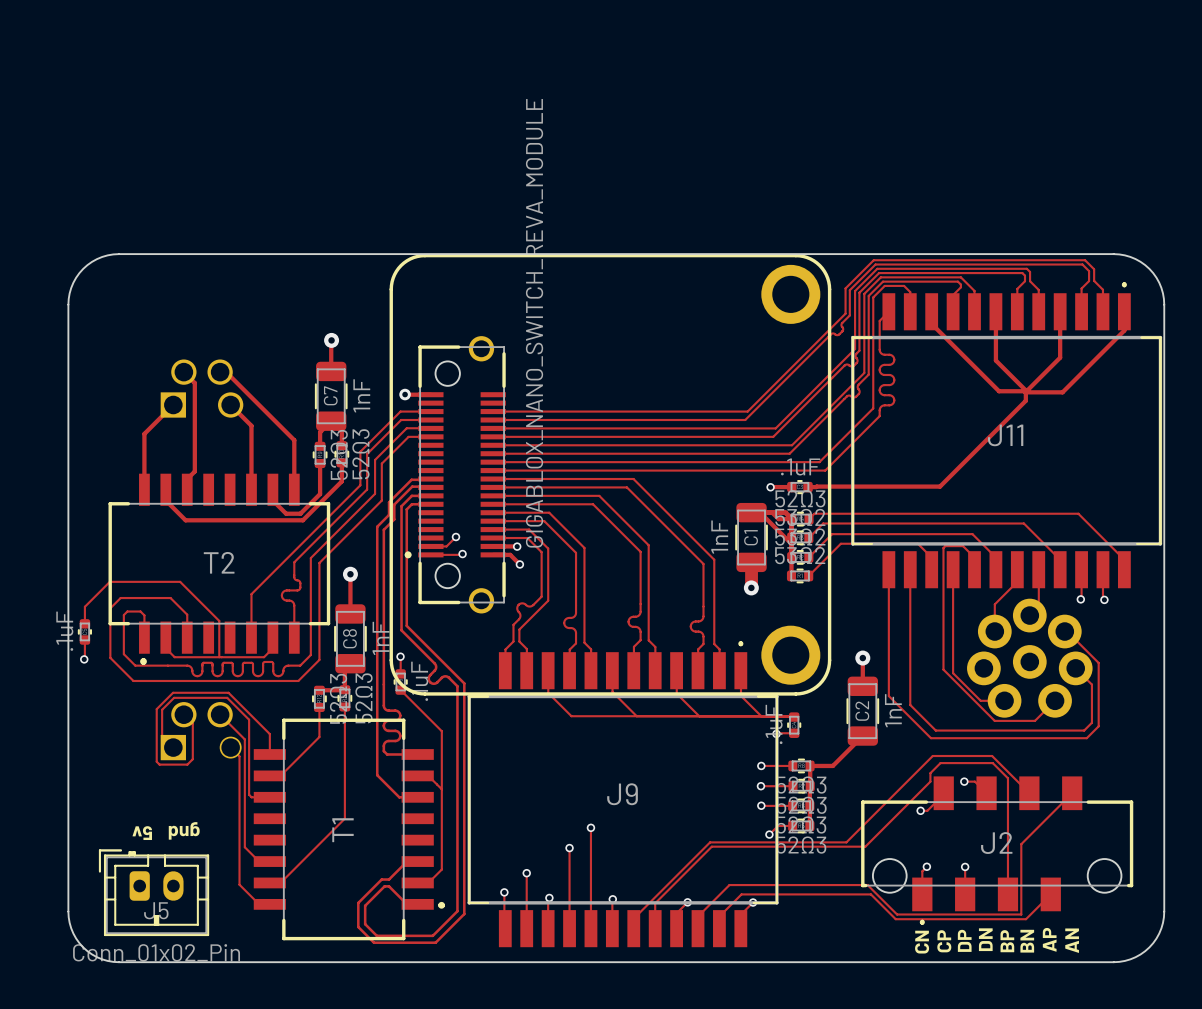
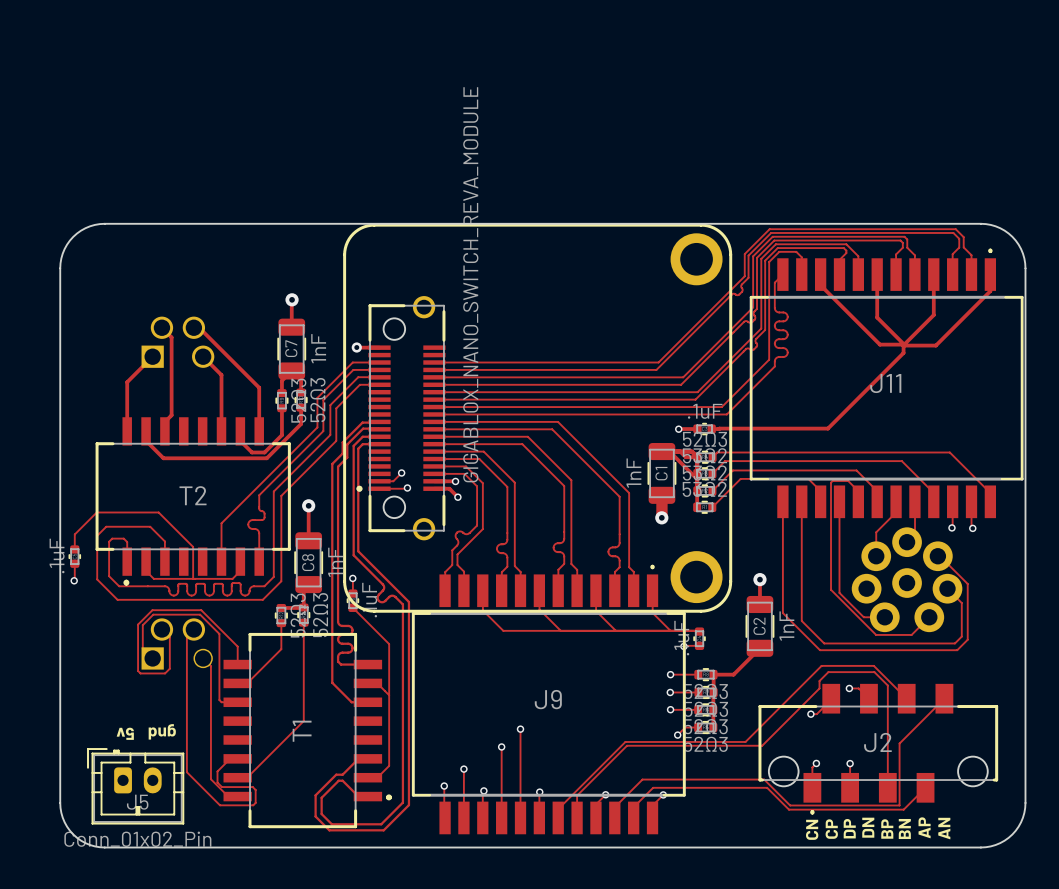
track: (220, 714) (244, 739) (244, 847) (261, 861) -> (193, 629) (186, 636) (186, 772) (220, 805) (253, 805) (255, 802) (255, 789) (252, 787) (221, 787) (217, 782) (217, 771) (230, 758)

